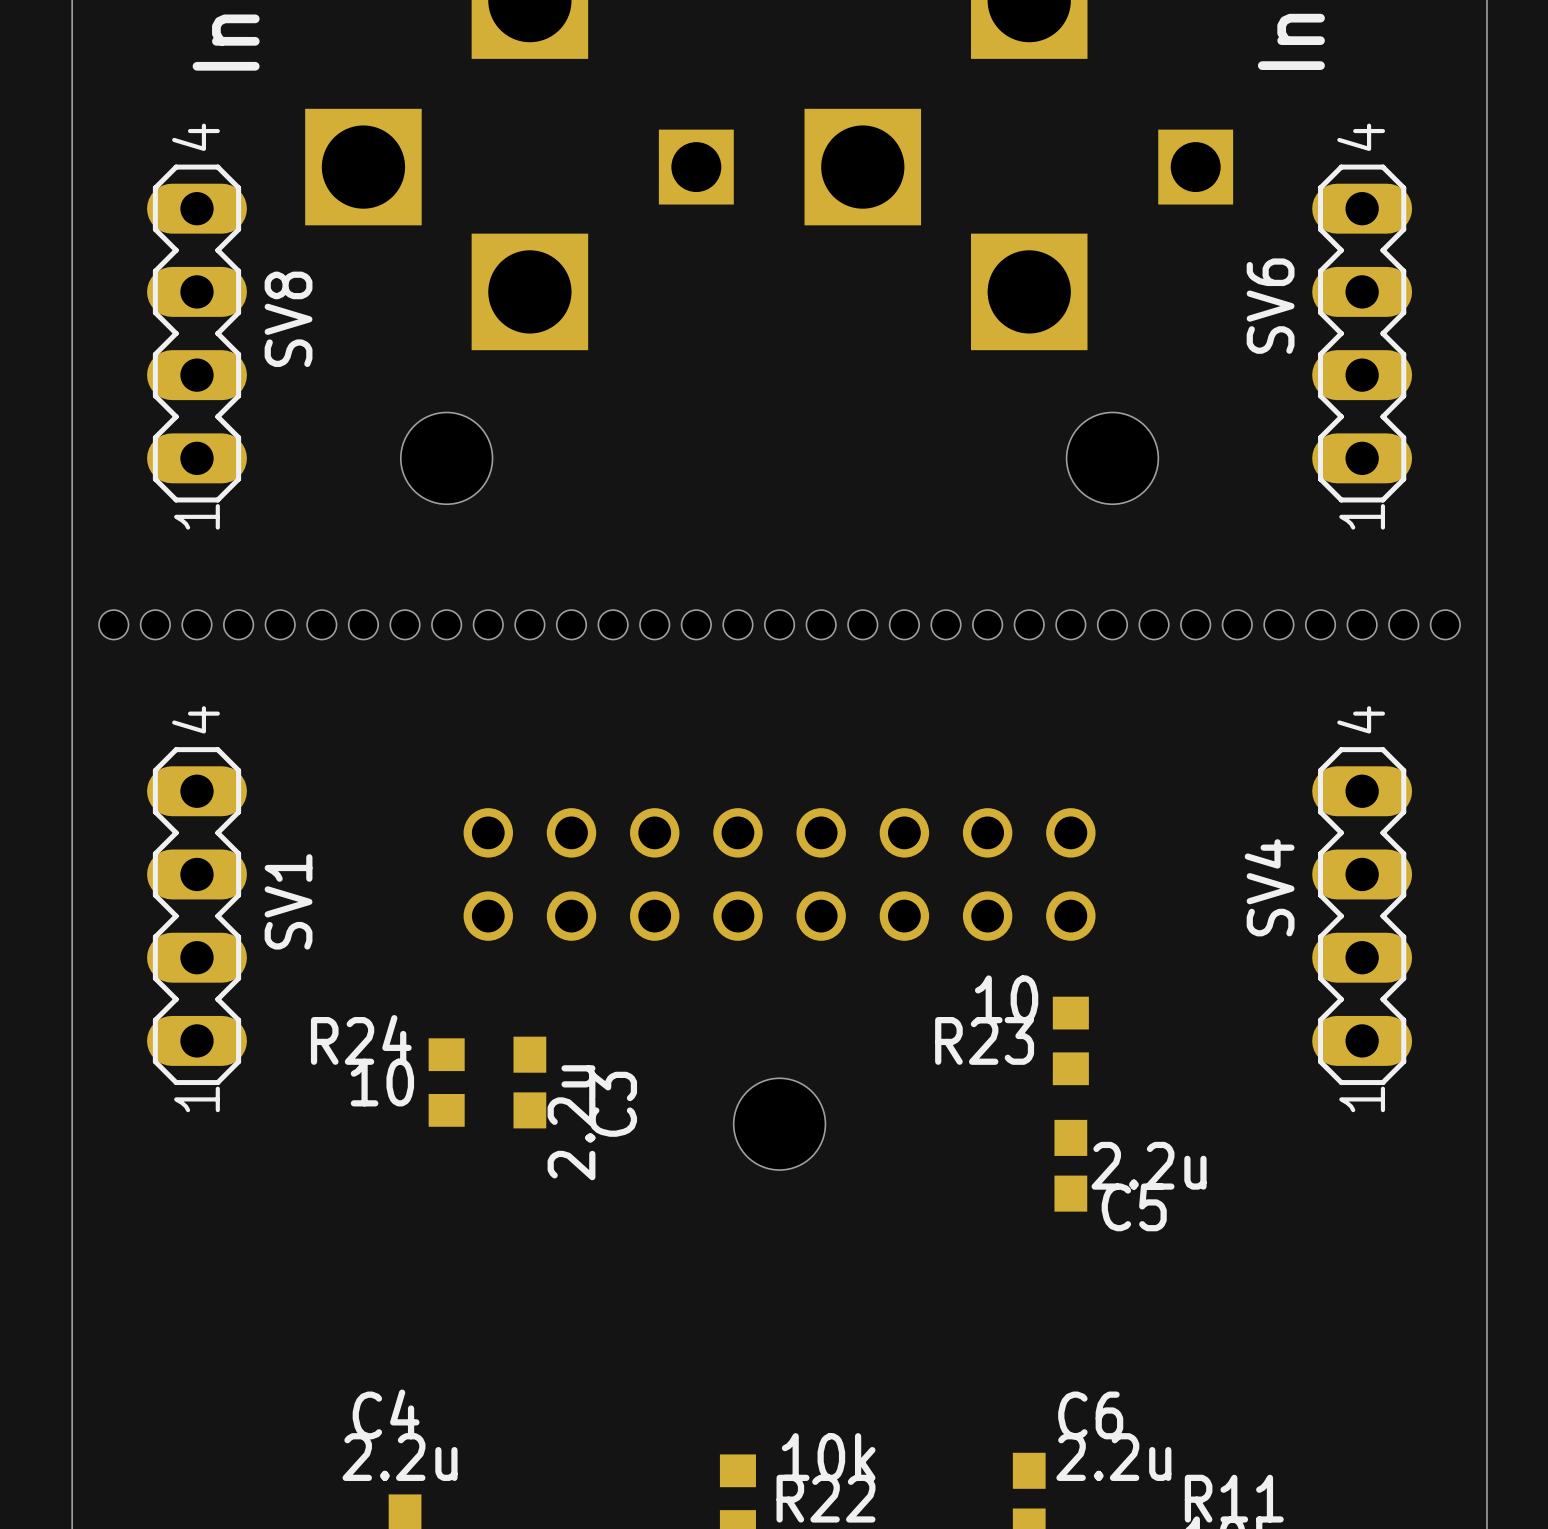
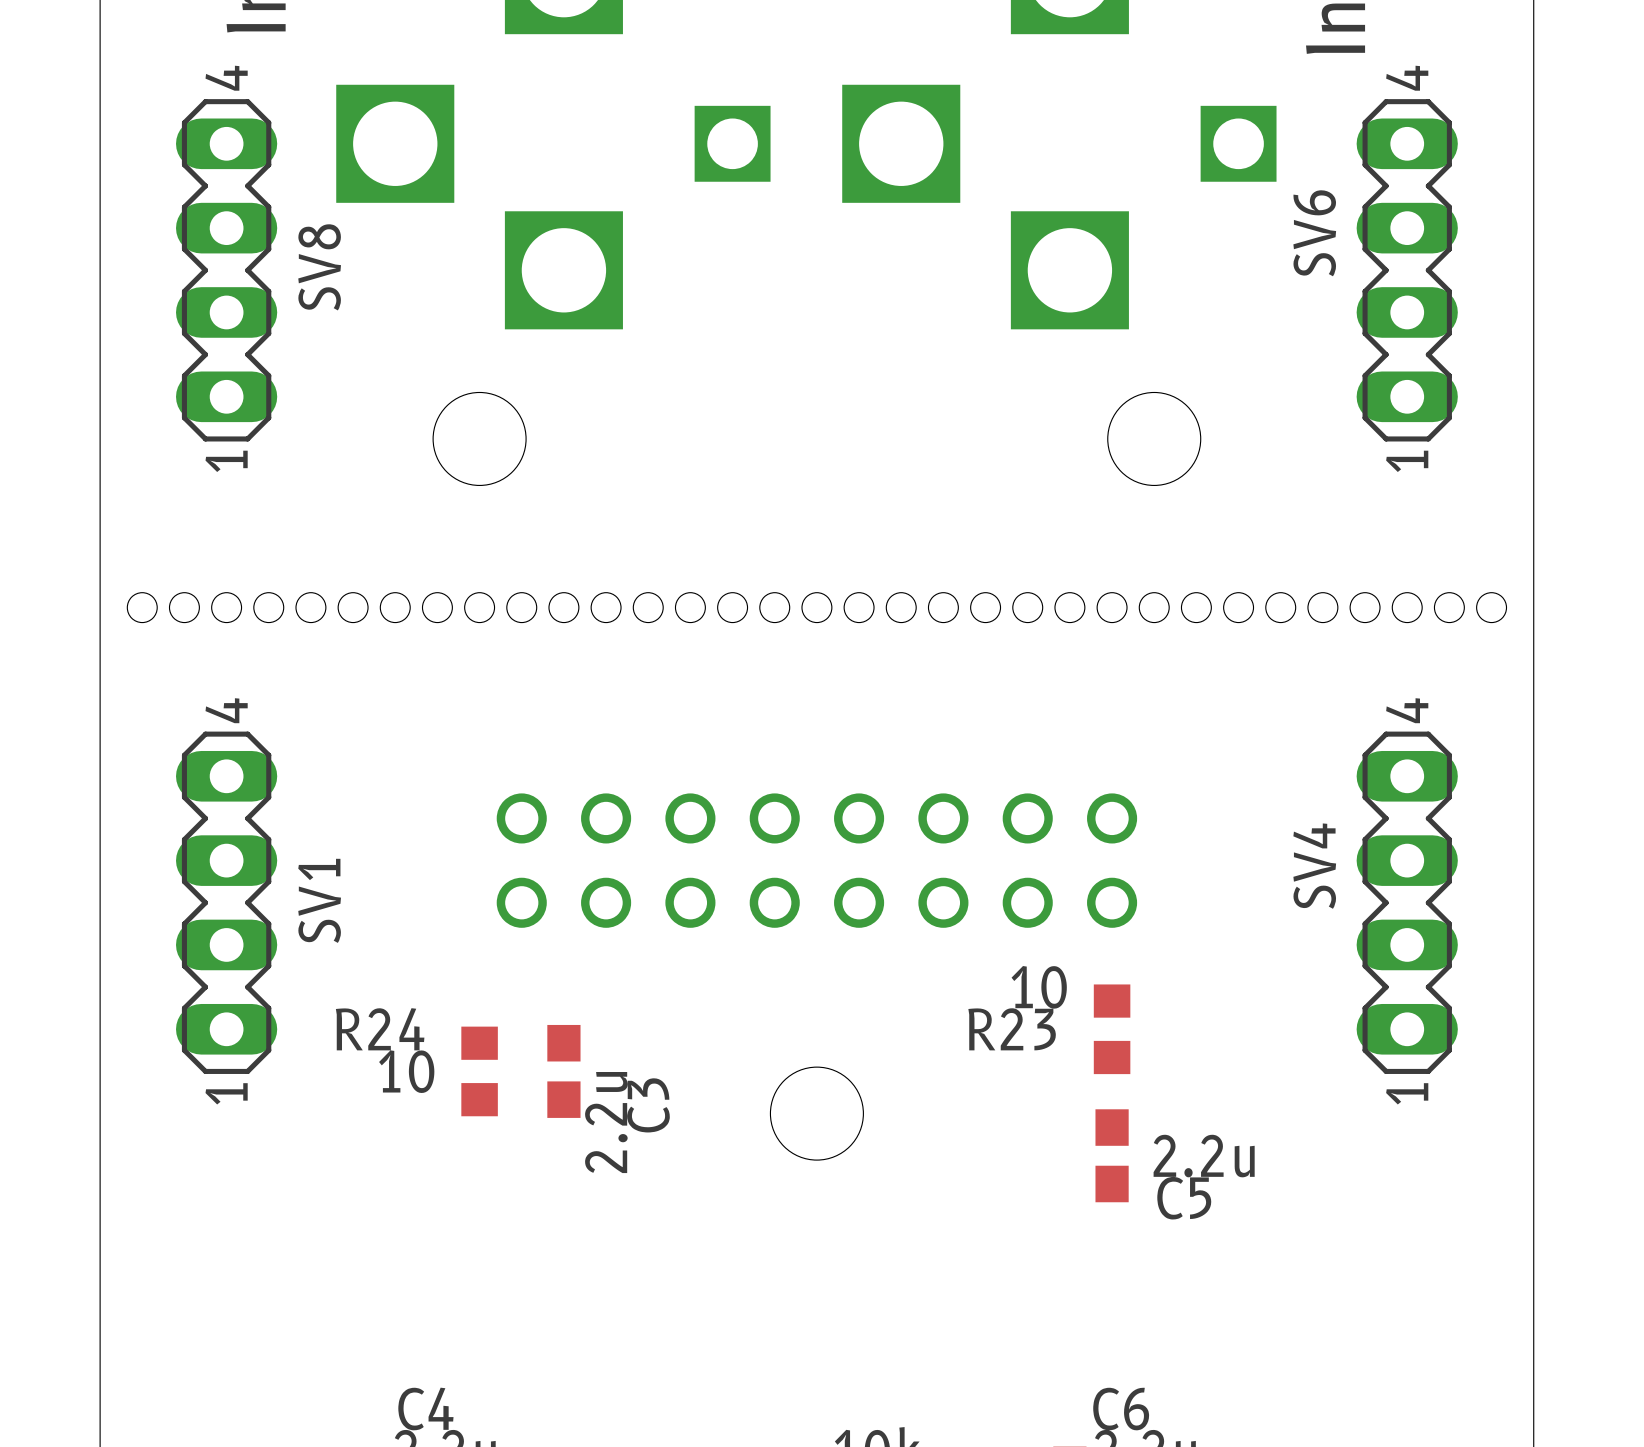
SV8 position: (196, 333) -> (226, 270)
SV6 position: (1362, 333) -> (1407, 270)

